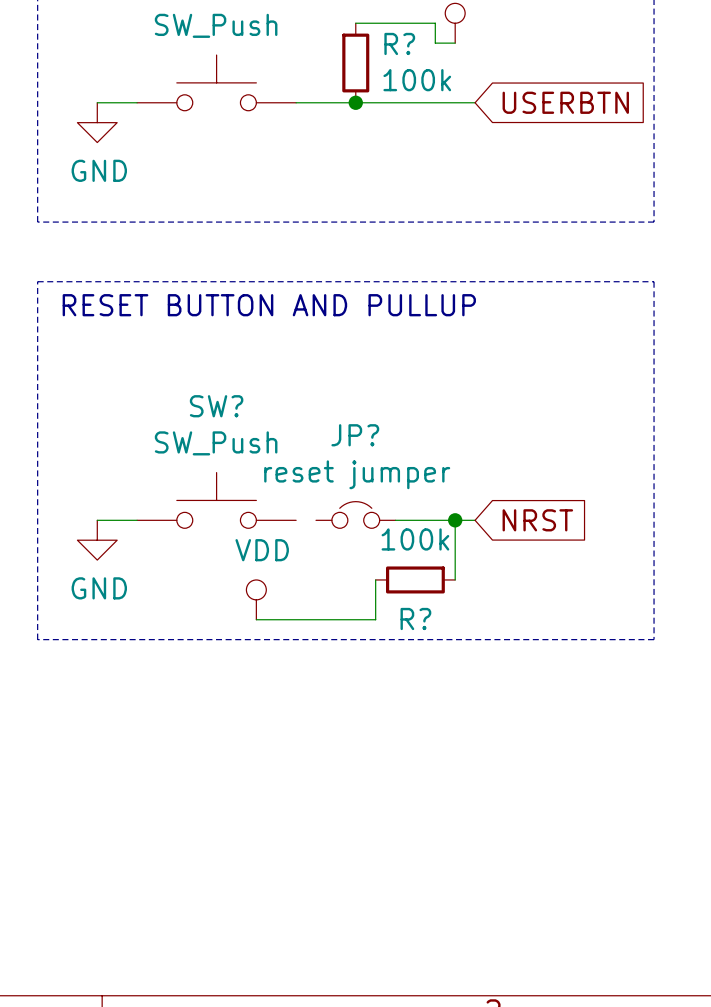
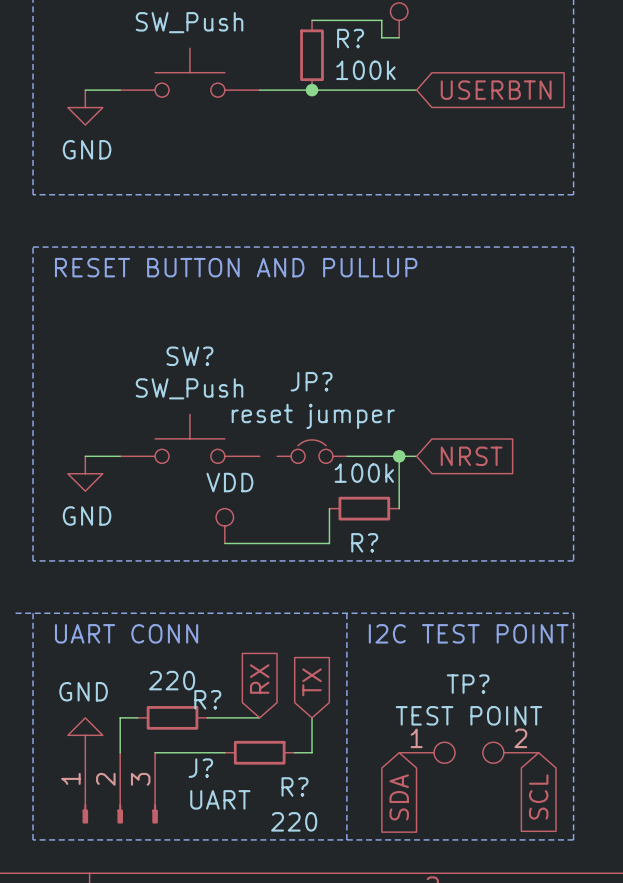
line: none -> (15, 613) (573, 613) (573, 839) (33, 839) (33, 613)
line: none -> (346, 613) (346, 839)
text: none -> UART CONN (126, 633)
text: none -> I2C TEST POINT (468, 633)
global label: none -> RX (259, 679)
global label: none -> TX (312, 682)
wire: none -> (137, 717) (120, 717) (120, 752)
R?: none -> 220 (172, 717)
wire: none -> (207, 717) (259, 717)
wire: none -> (312, 717) (312, 752) (294, 752)
power symbol: none -> GND (85, 735)
wire: none -> (155, 752) (224, 752)
R?: none -> 220 (259, 752)
TP?: none -> TEST POINT (468, 752)
J?: none -> UART (120, 788)
global label: none -> SCL (538, 796)
global label: none -> SDA (399, 797)

